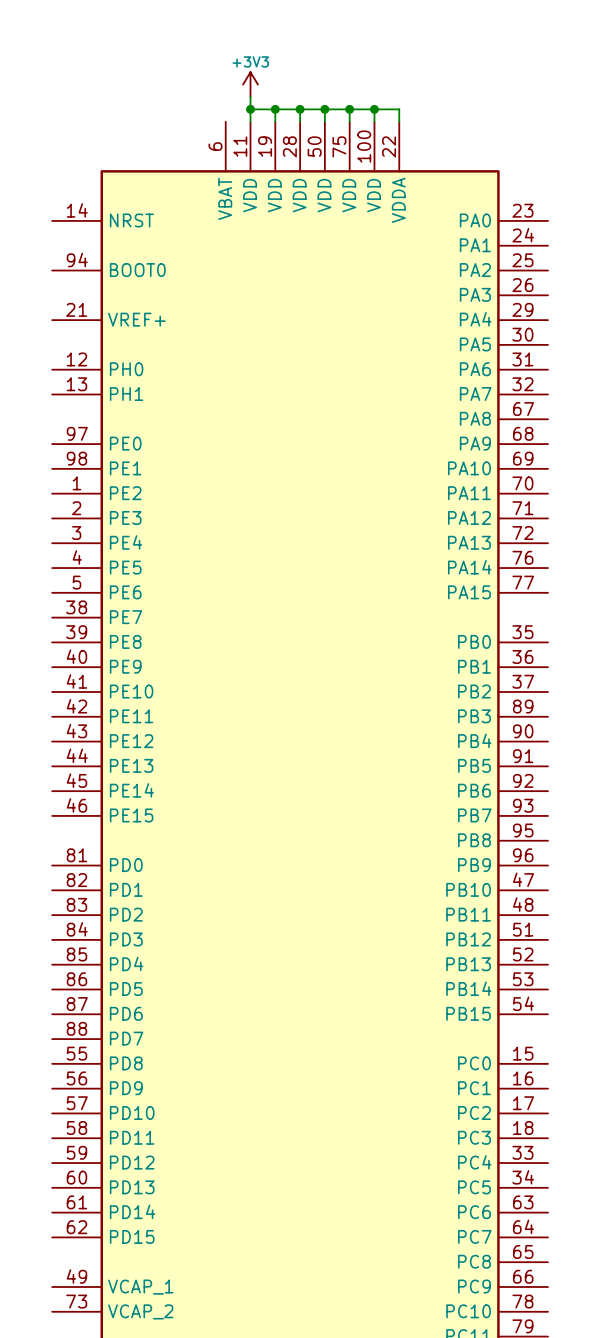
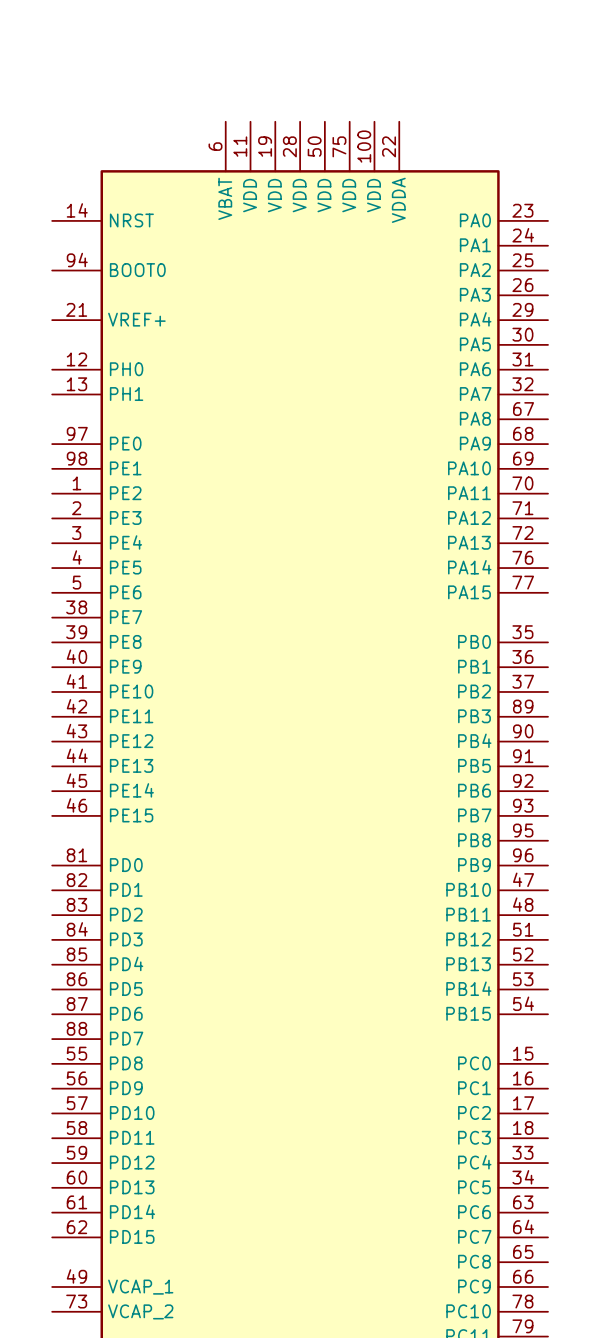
power symbol: +3V3 (250, 84) -> none
wire: (250, 96) (250, 121) -> none
wire: (250, 109) (399, 109) (399, 121) -> none
junction: (250, 109) -> none
wire: (275, 109) (275, 121) -> none
junction: (275, 109) -> none
wire: (300, 109) (300, 121) -> none
junction: (300, 109) -> none
wire: (324, 109) (324, 121) -> none
junction: (324, 109) -> none
wire: (349, 109) (349, 121) -> none
junction: (349, 109) -> none
wire: (374, 109) (374, 121) -> none
junction: (374, 109) -> none

